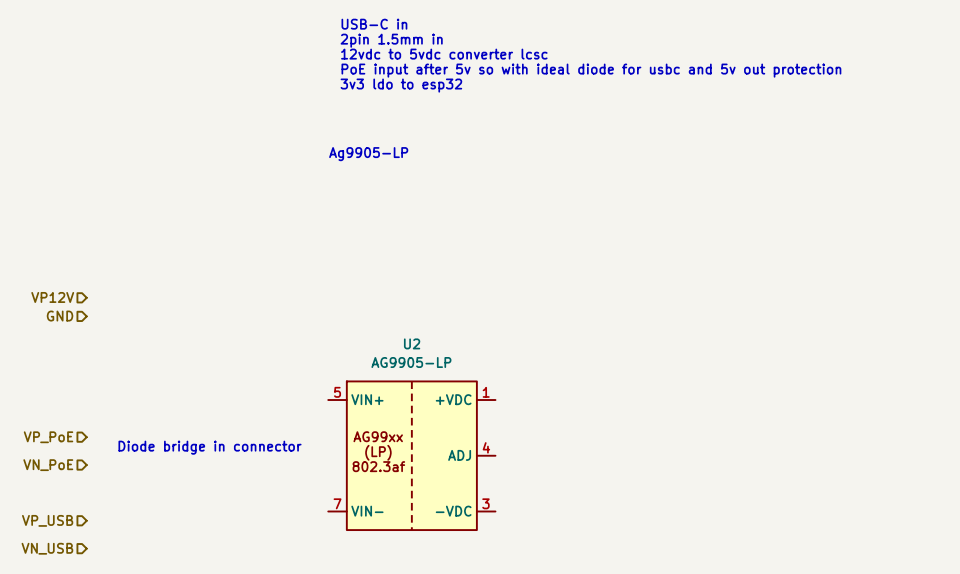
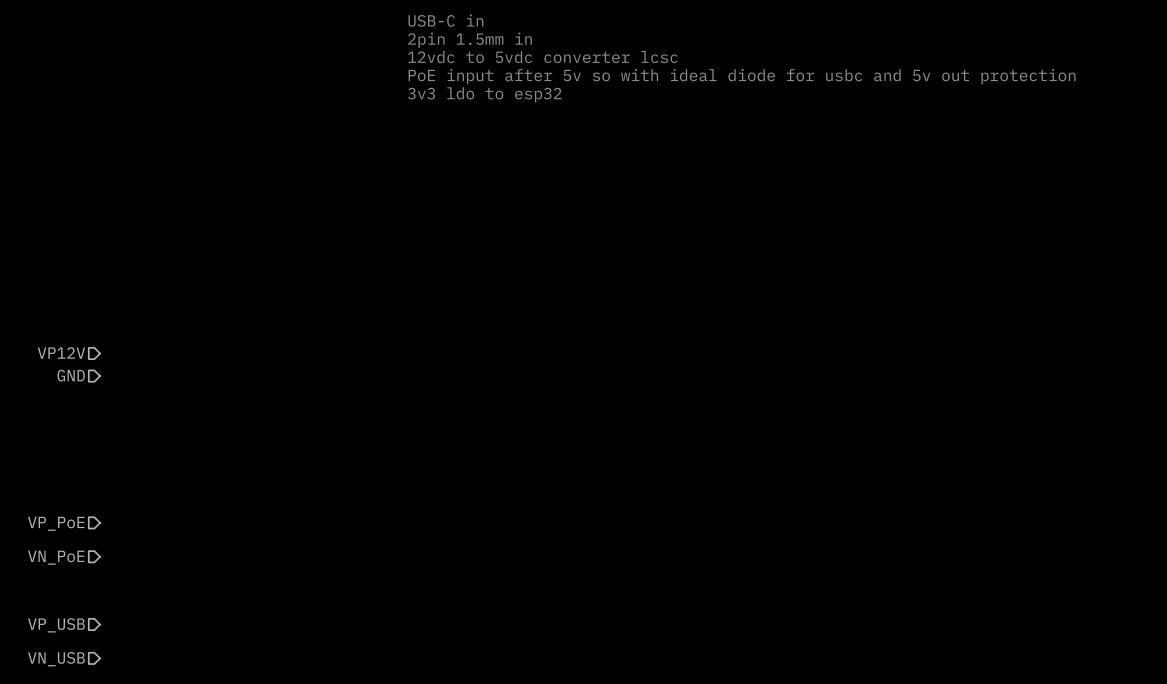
text: Ag9905-LP (368, 154) -> none
text: Diode bridge in connector (210, 447) -> none
U2: AG9905-LP (411, 455) -> none

